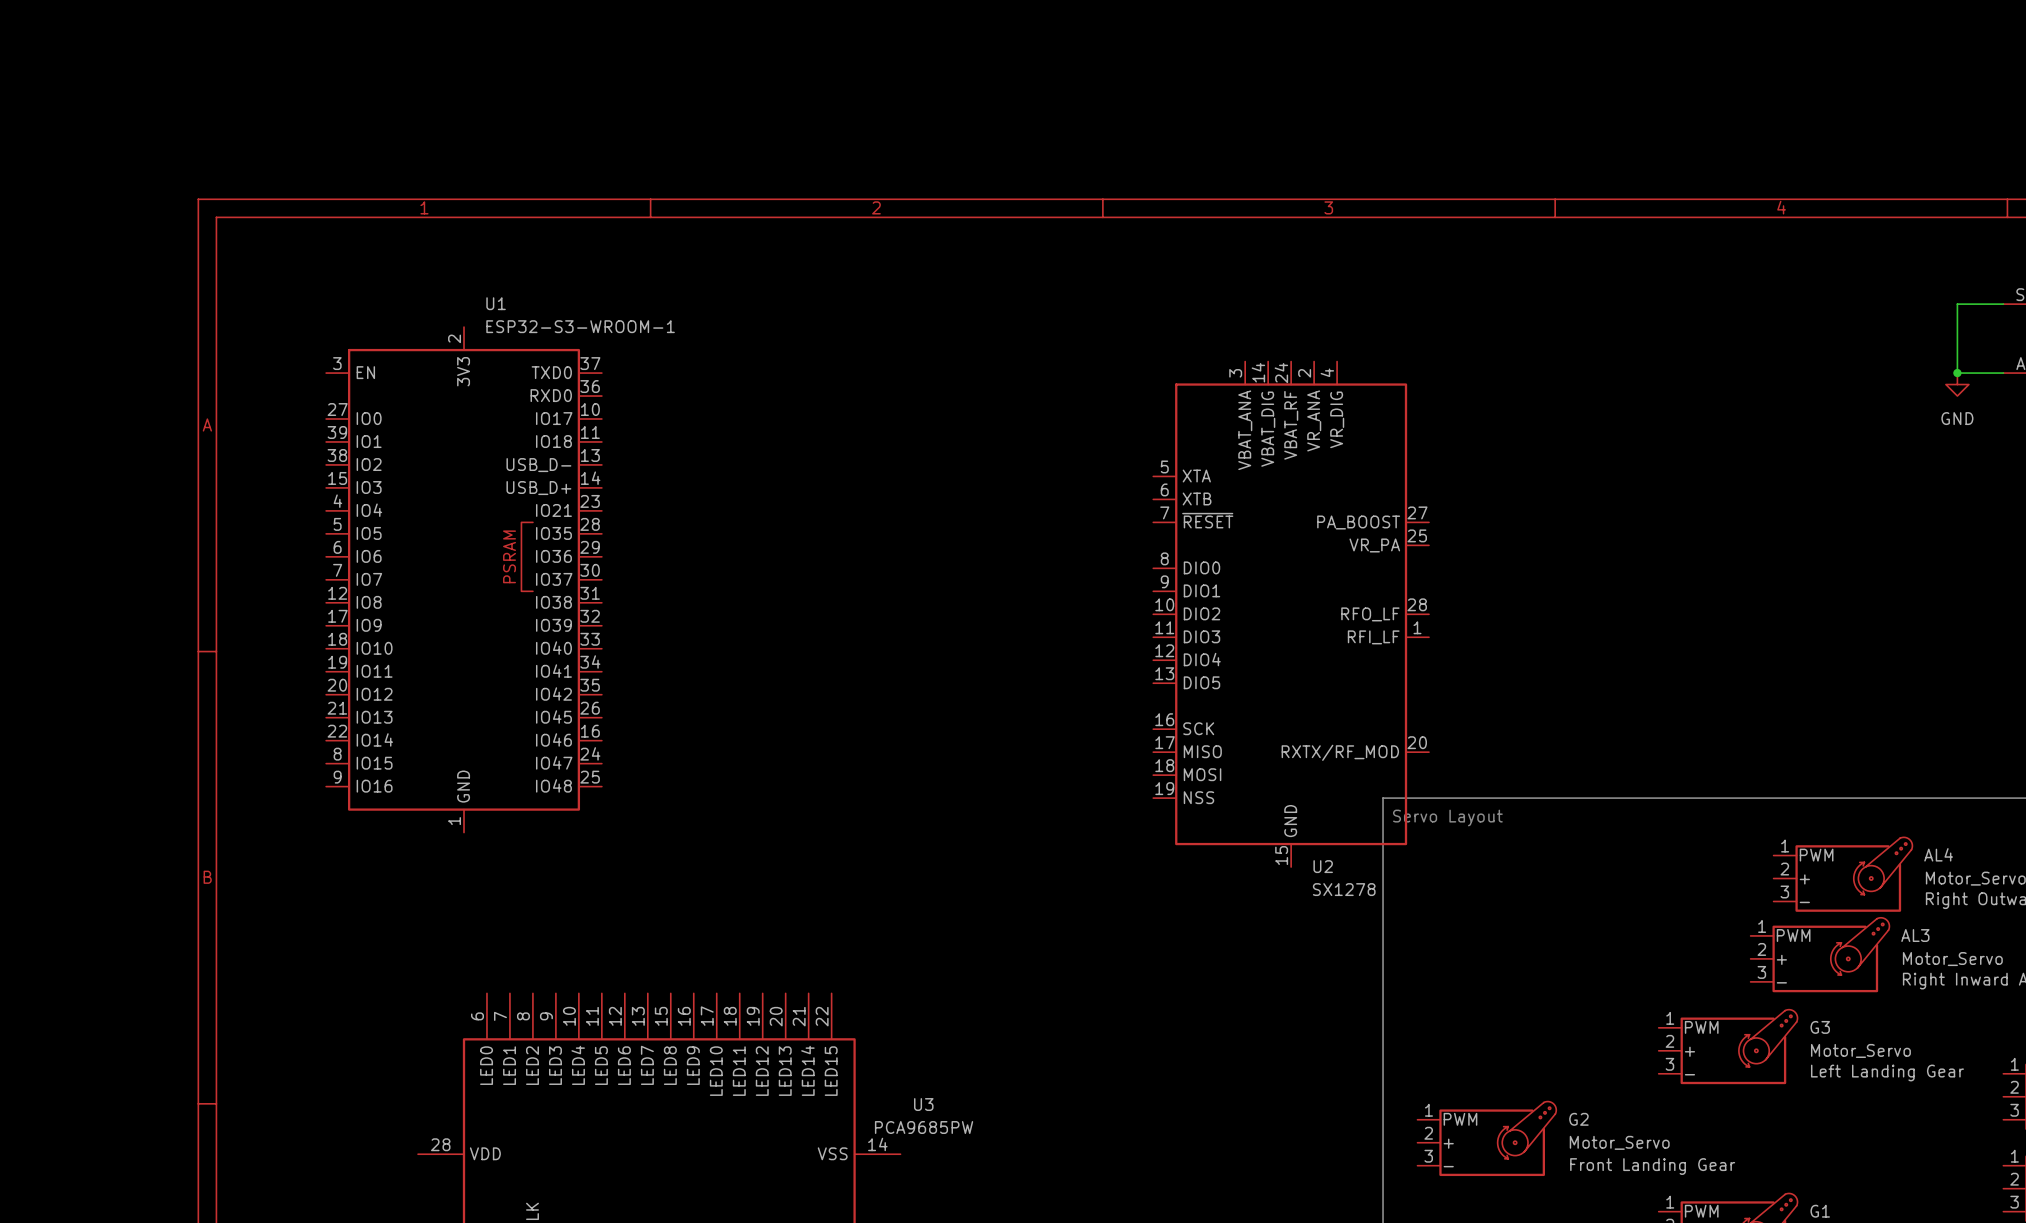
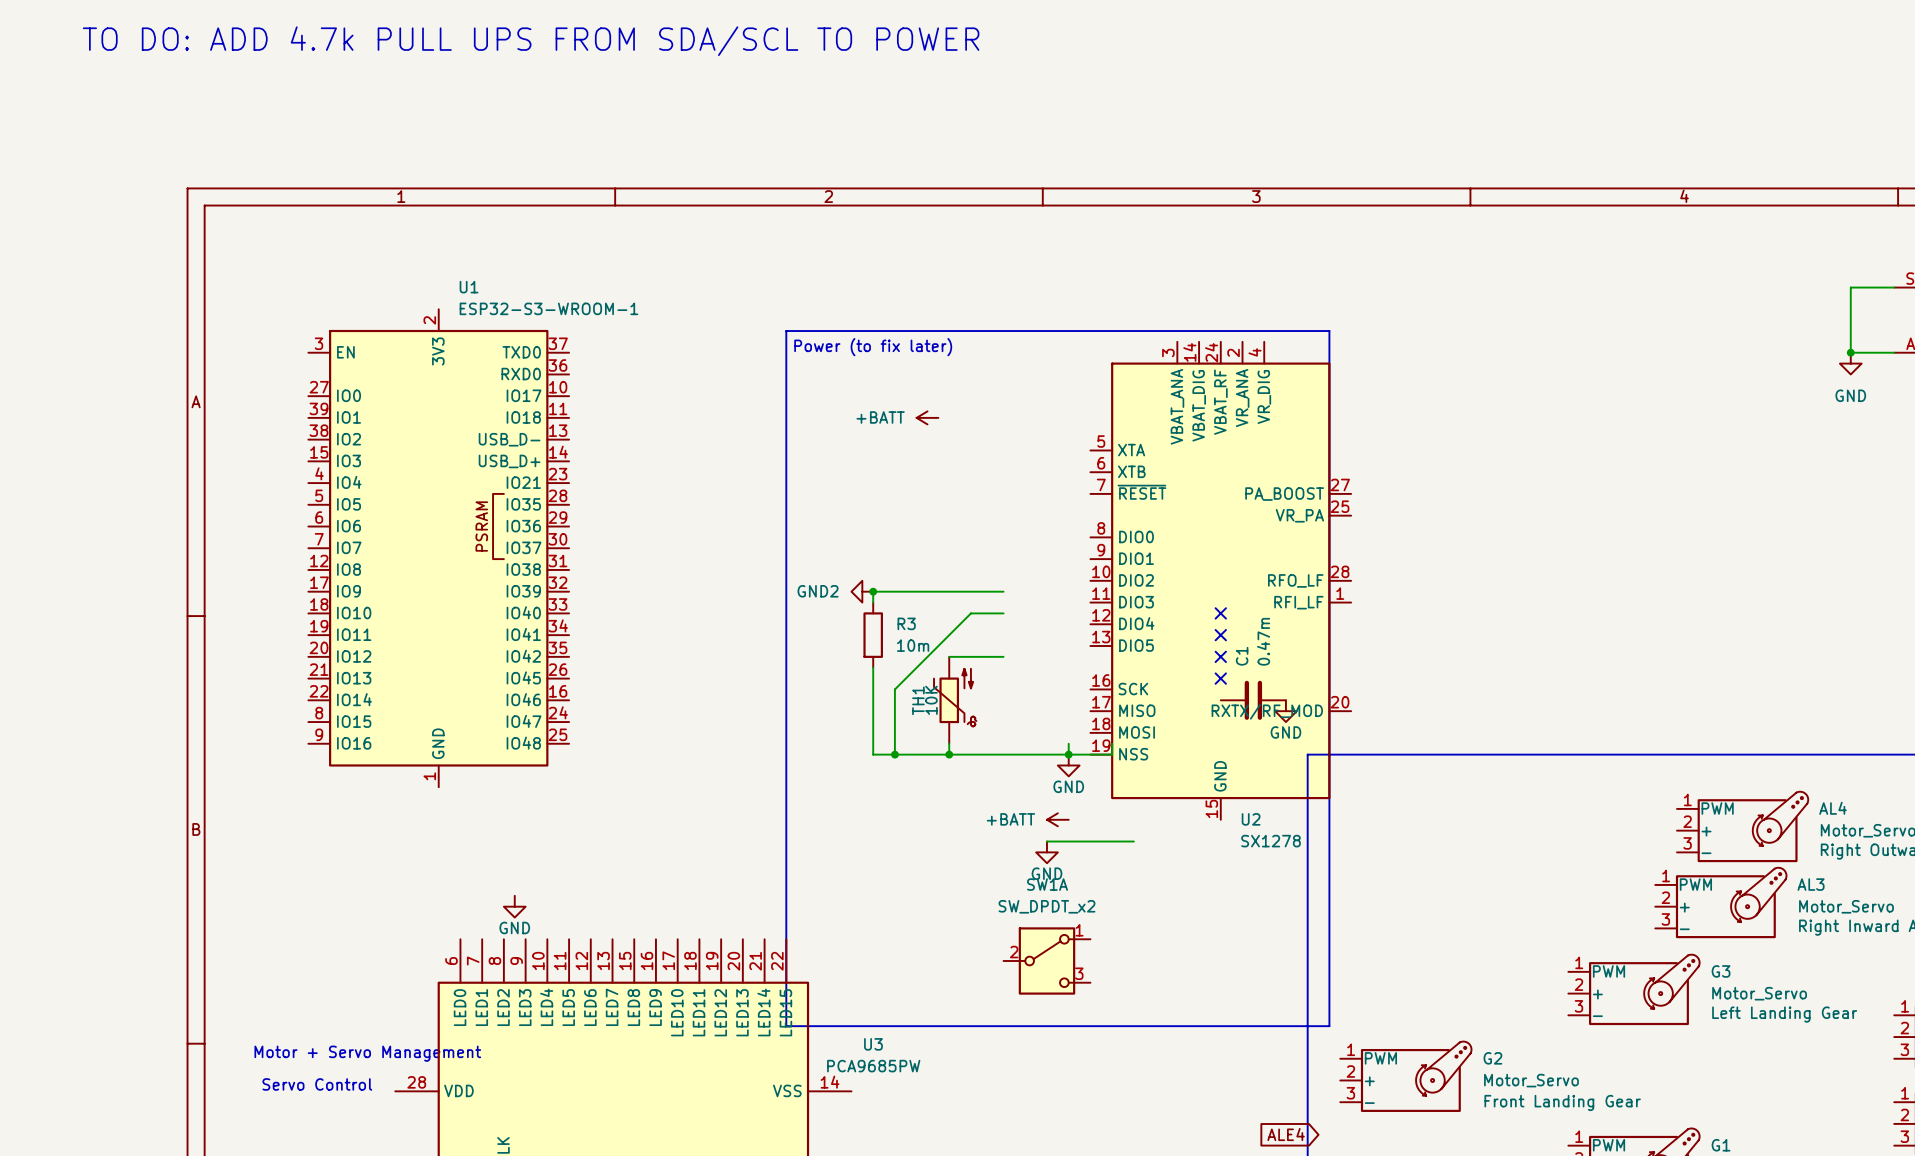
text: none -> TO DO: ADD 4.7k PULL UPS FROM SDA/SCL TO POWER (531, 41)
line: none -> (786, 331) (1329, 331) (1329, 1026) (786, 1026) (786, 331)
text: none -> Power (to fix later) (873, 347)
power symbol: none -> +BATT (927, 417)
power symbol: none -> GND2 (862, 591)
junction: none -> (873, 591)
wire: none -> (1003, 591) (873, 591) (873, 602)
wire: none -> (1003, 613) (970, 613) (894, 689) (894, 754)
no-connect mark: none -> (1220, 613)
R3: none -> 10m (873, 635)
no-connect mark: none -> (1220, 635)
wire: none -> (949, 656) (1003, 656)
no-connect mark: none -> (1220, 656)
wire: none -> (873, 667) (873, 754) (1112, 754) (1112, 743)
no-connect mark: none -> (1220, 678)
TH1: none -> 10K (955, 700)
C1: none -> 0.47m (1253, 700)
power symbol: none -> GND (1285, 711)
wire: none -> (949, 743) (949, 754)
wire: none -> (1068, 743) (1068, 754)
junction: none -> (894, 754)
junction: none -> (949, 754)
junction: none -> (1068, 754)
power symbol: none -> GND (1068, 765)
text: Servo Layout (1447, 818) -> none
power symbol: none -> +BATT (1057, 819)
wire: none -> (1046, 841) (1133, 841)
power symbol: none -> GND (1046, 852)
power symbol: none -> GND (514, 906)
SW1A: none -> SW_DPDT_x2 (1046, 961)
text: none -> Motor + Servo Management (367, 1053)
text: none -> Servo Control (317, 1084)
global label: none -> ALE4 (1286, 1134)

